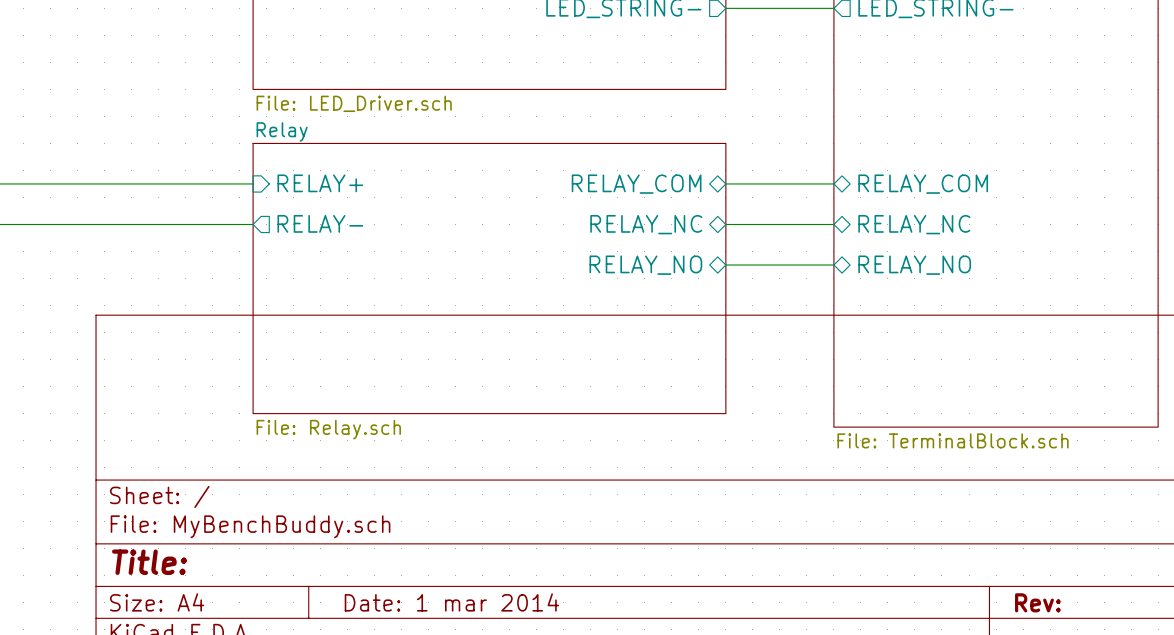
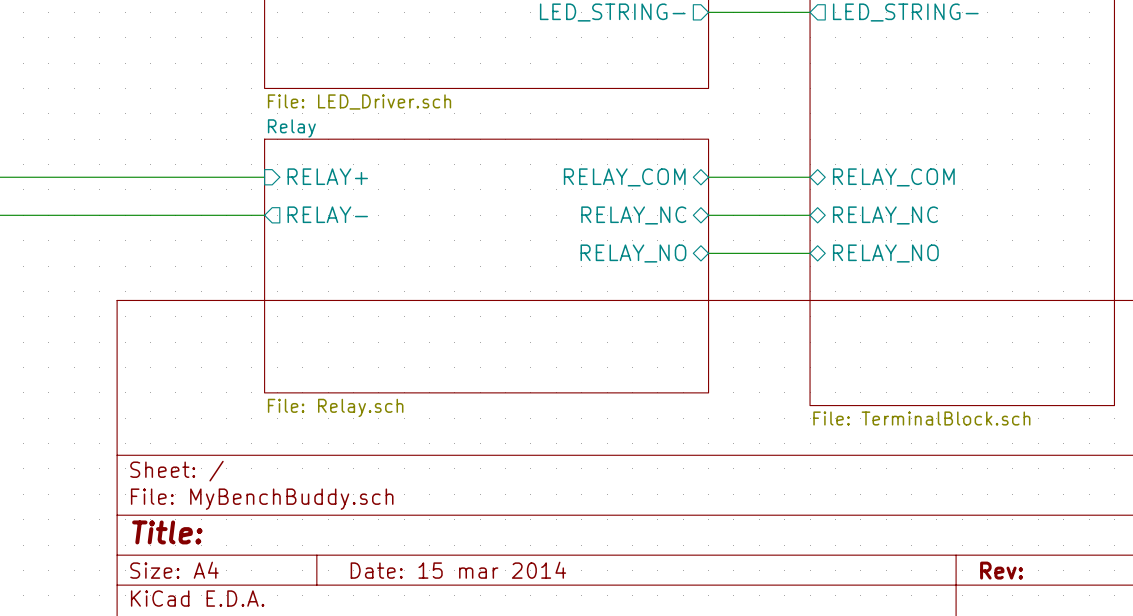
title block: Date: 1 mar 2014 (451, 602) -> Date: 15 mar 2014 (458, 570)

